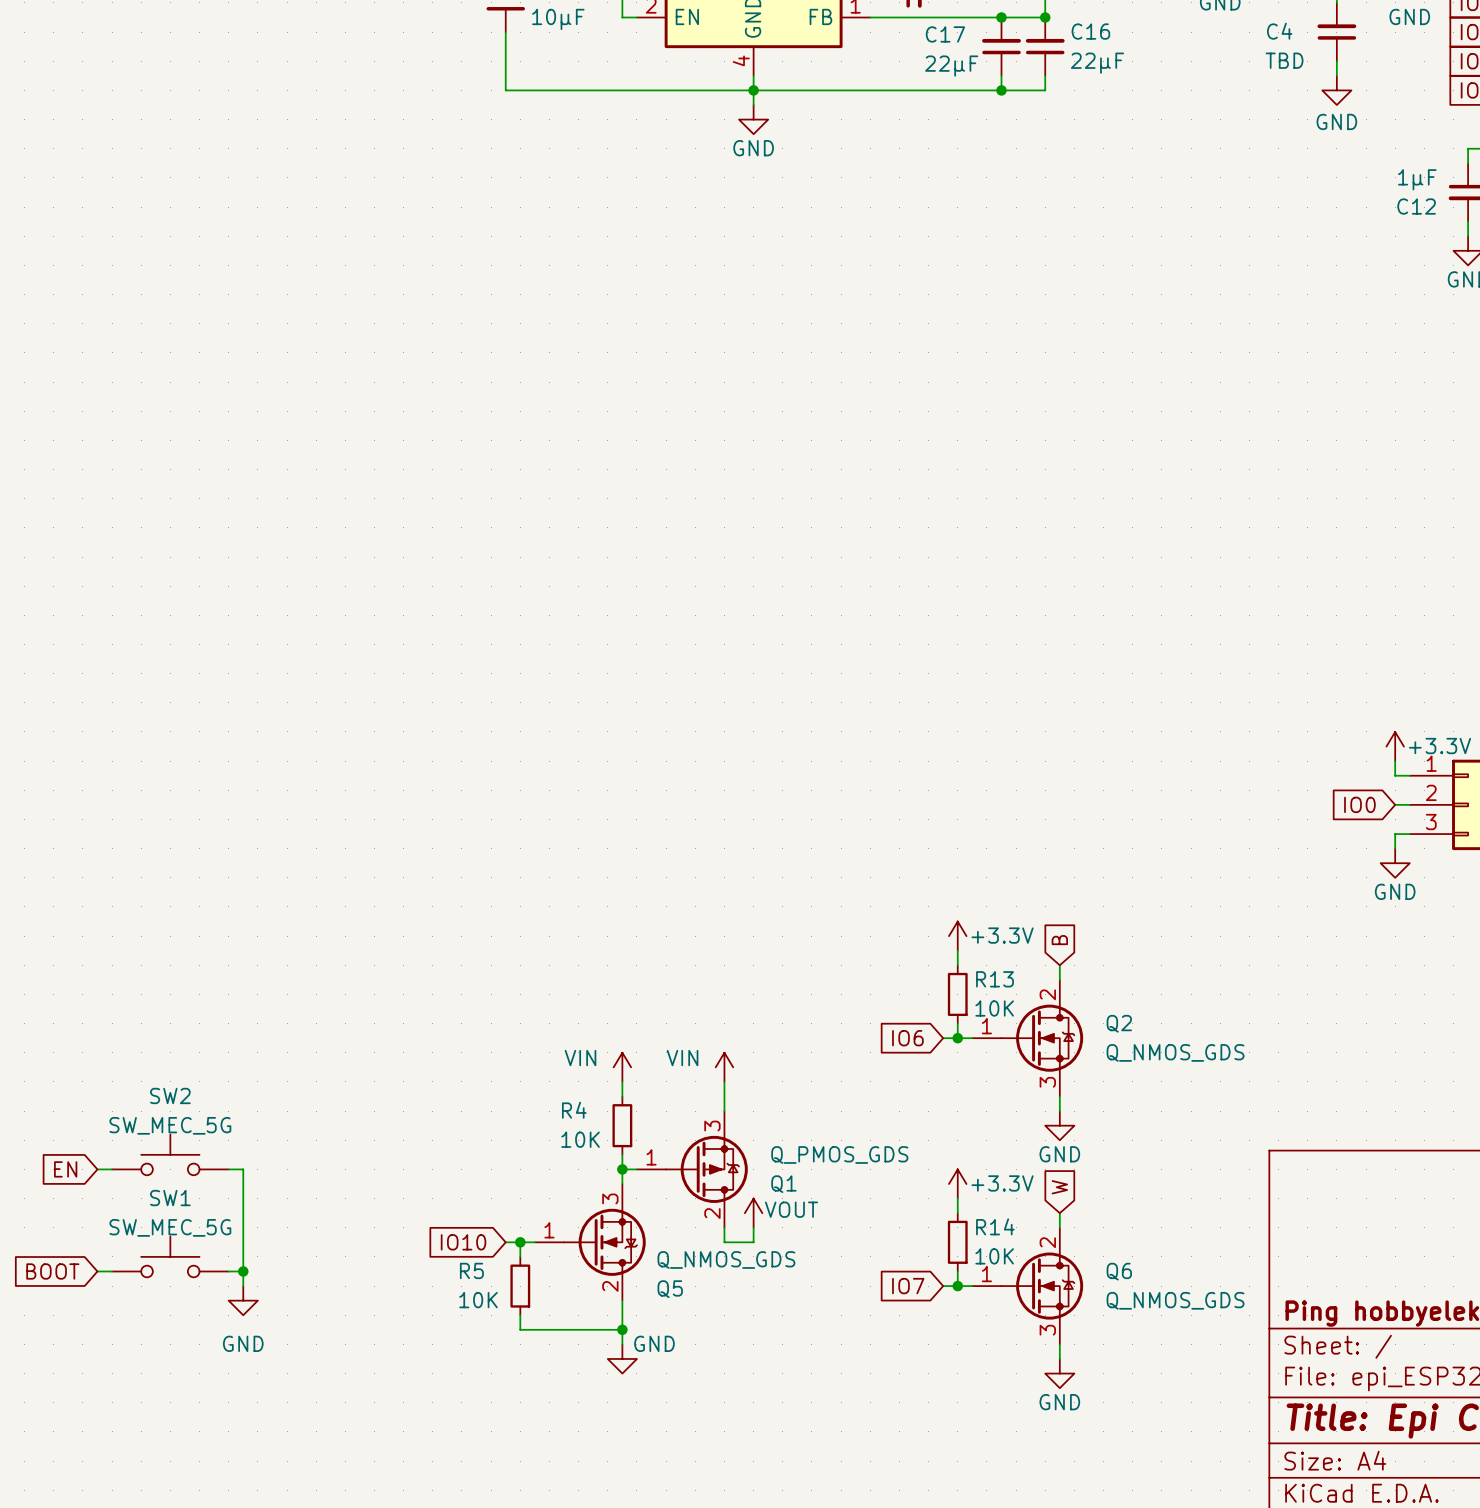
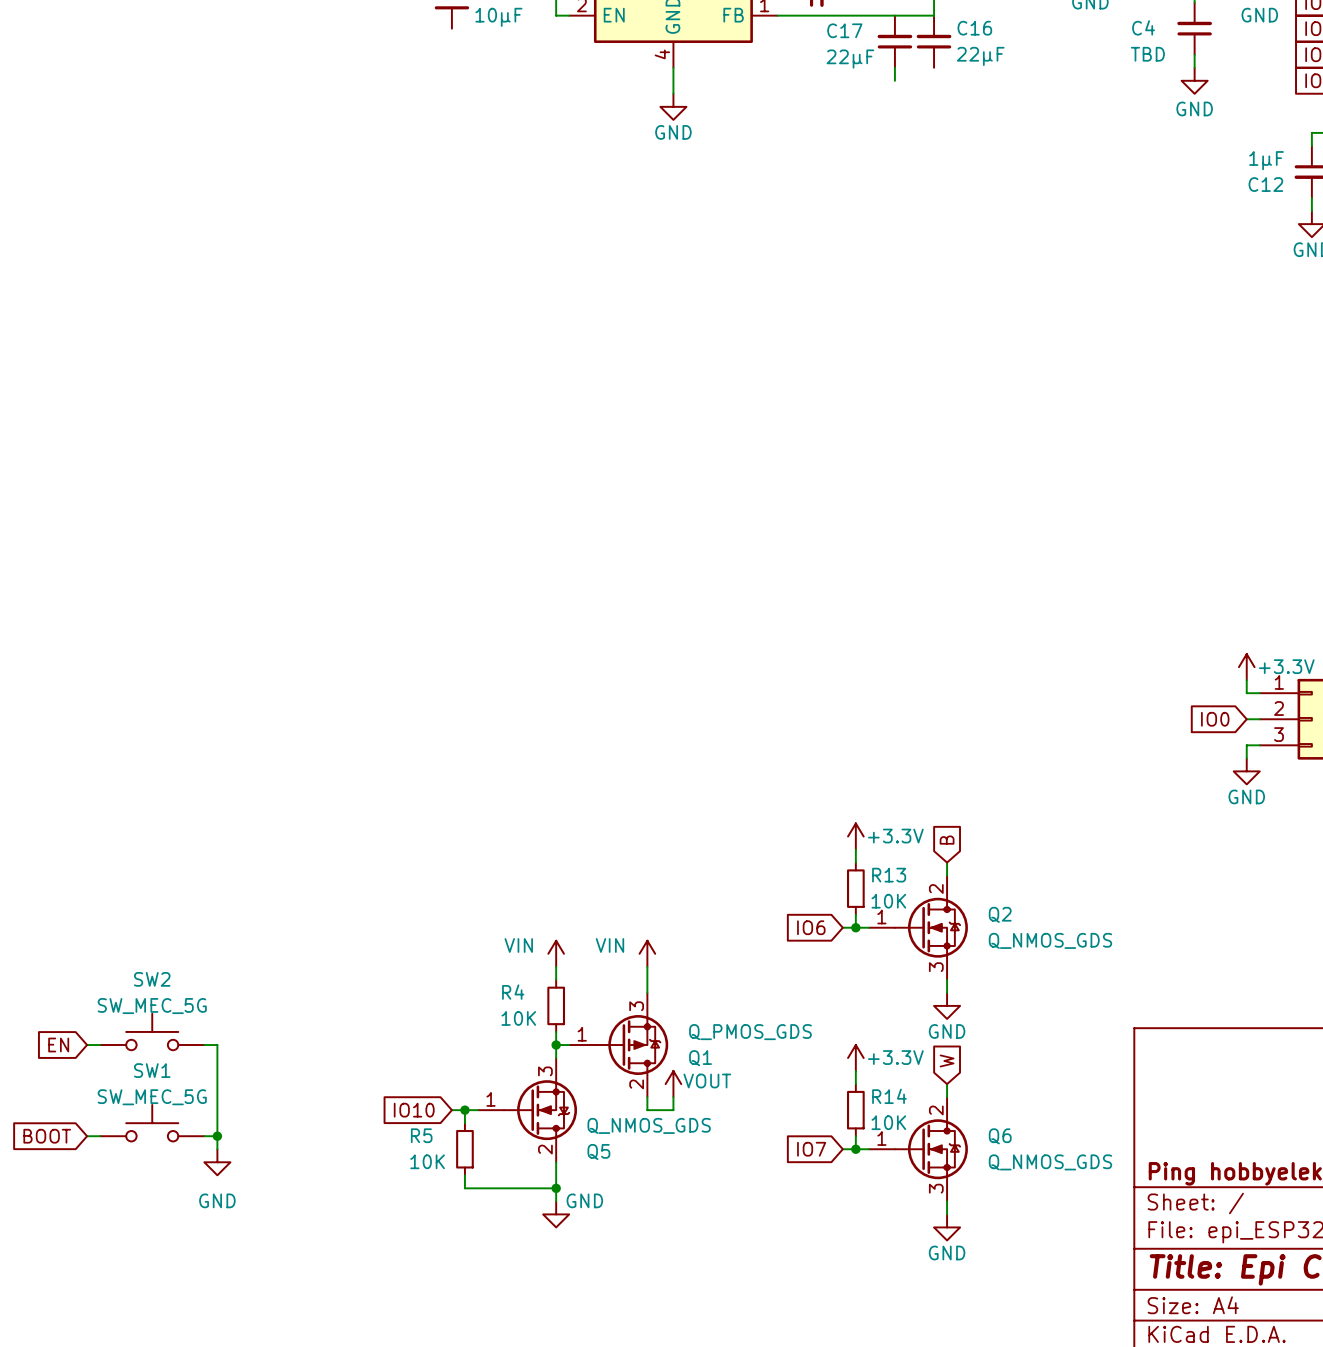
junction: (1001, 17) -> none
junction: (1045, 17) -> none
wire: (505, 32) (505, 90) (1045, 90) (1045, 75) -> none
junction: (753, 90) -> none
junction: (1001, 90) -> none

